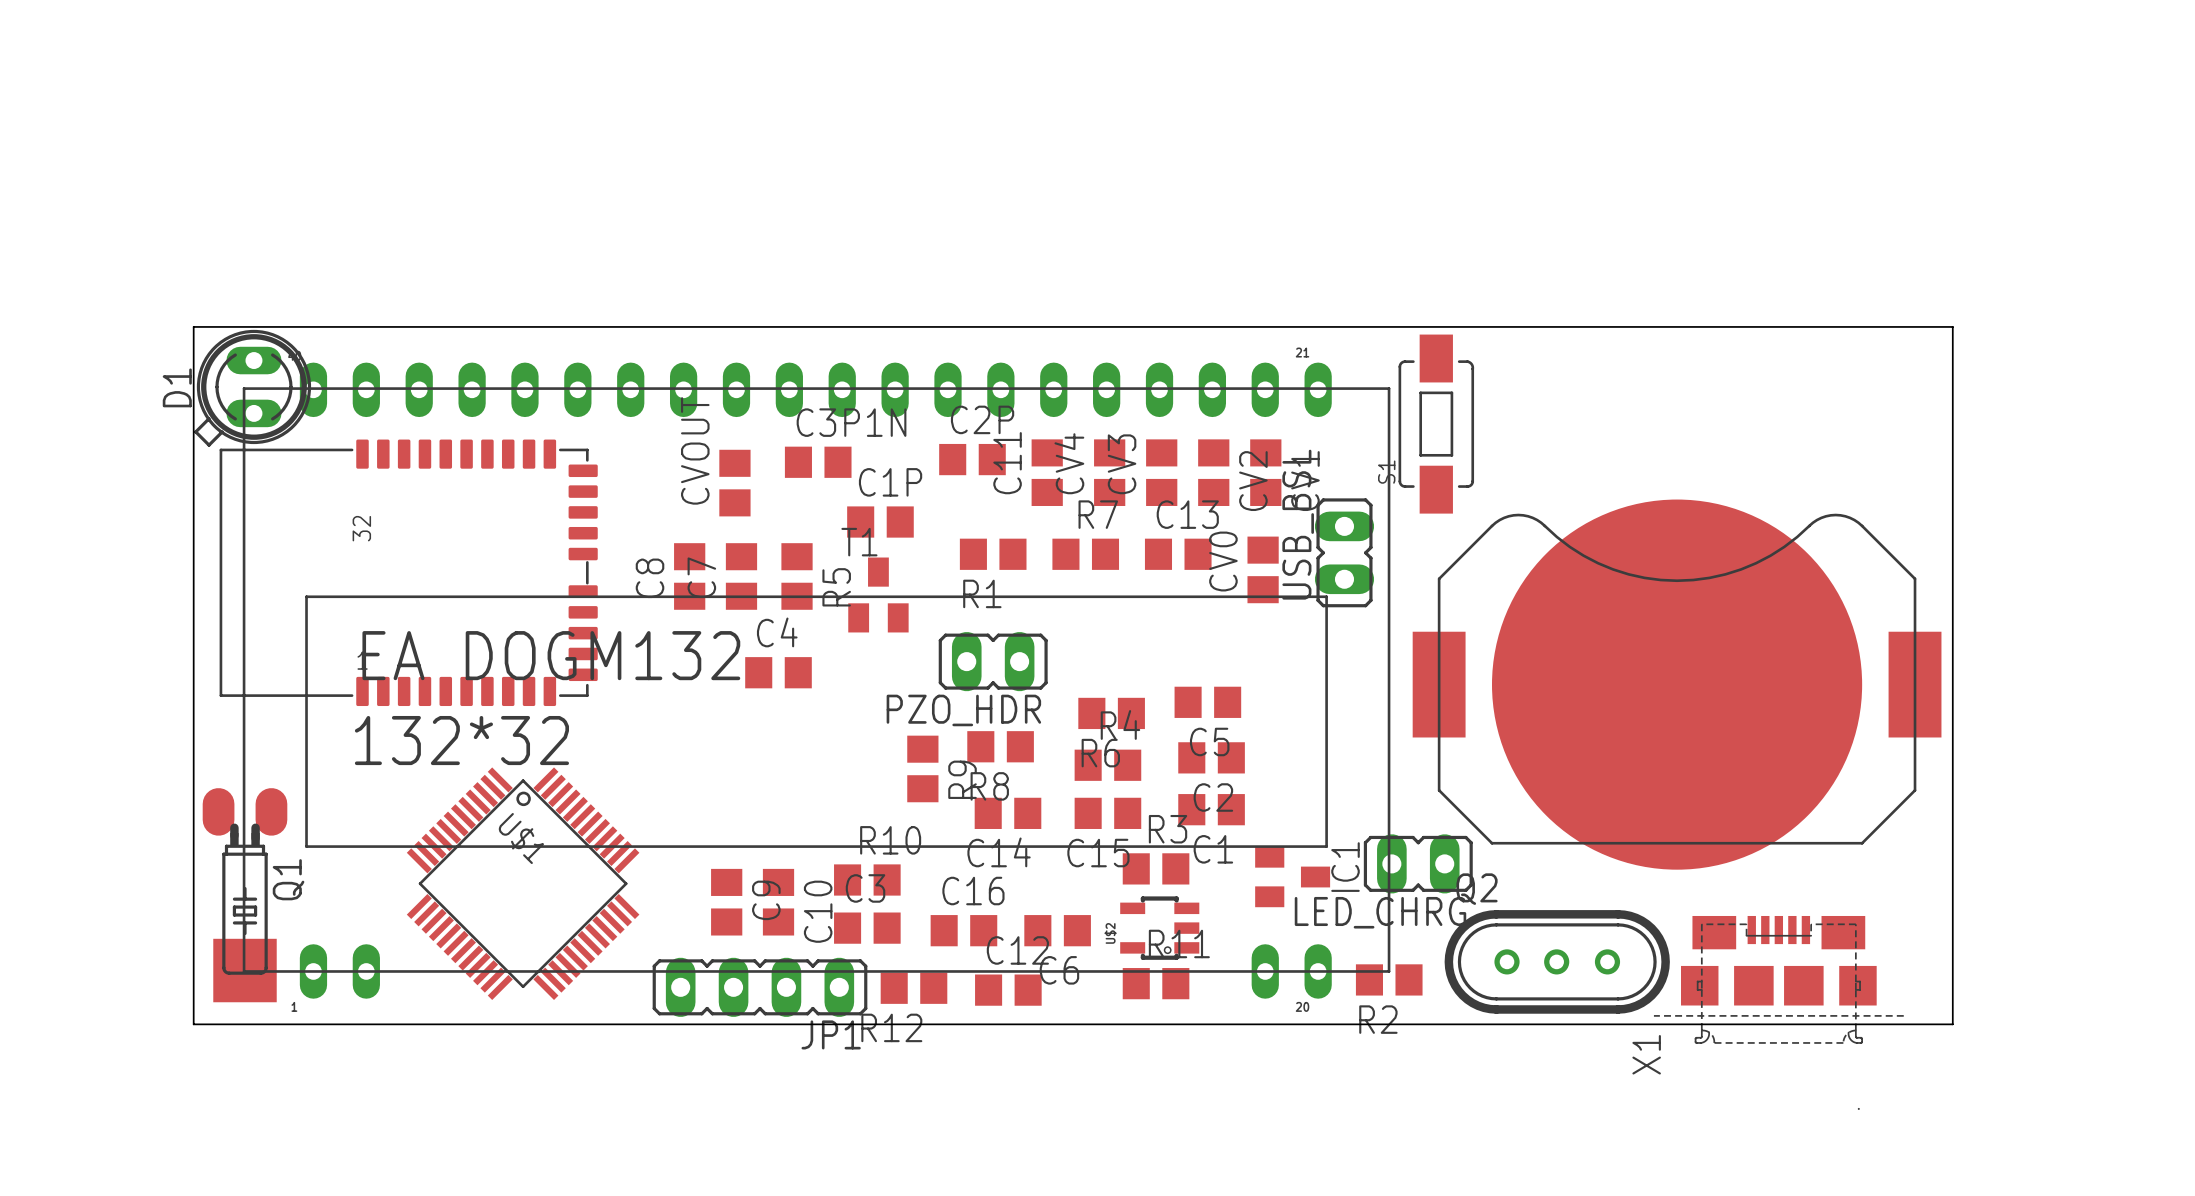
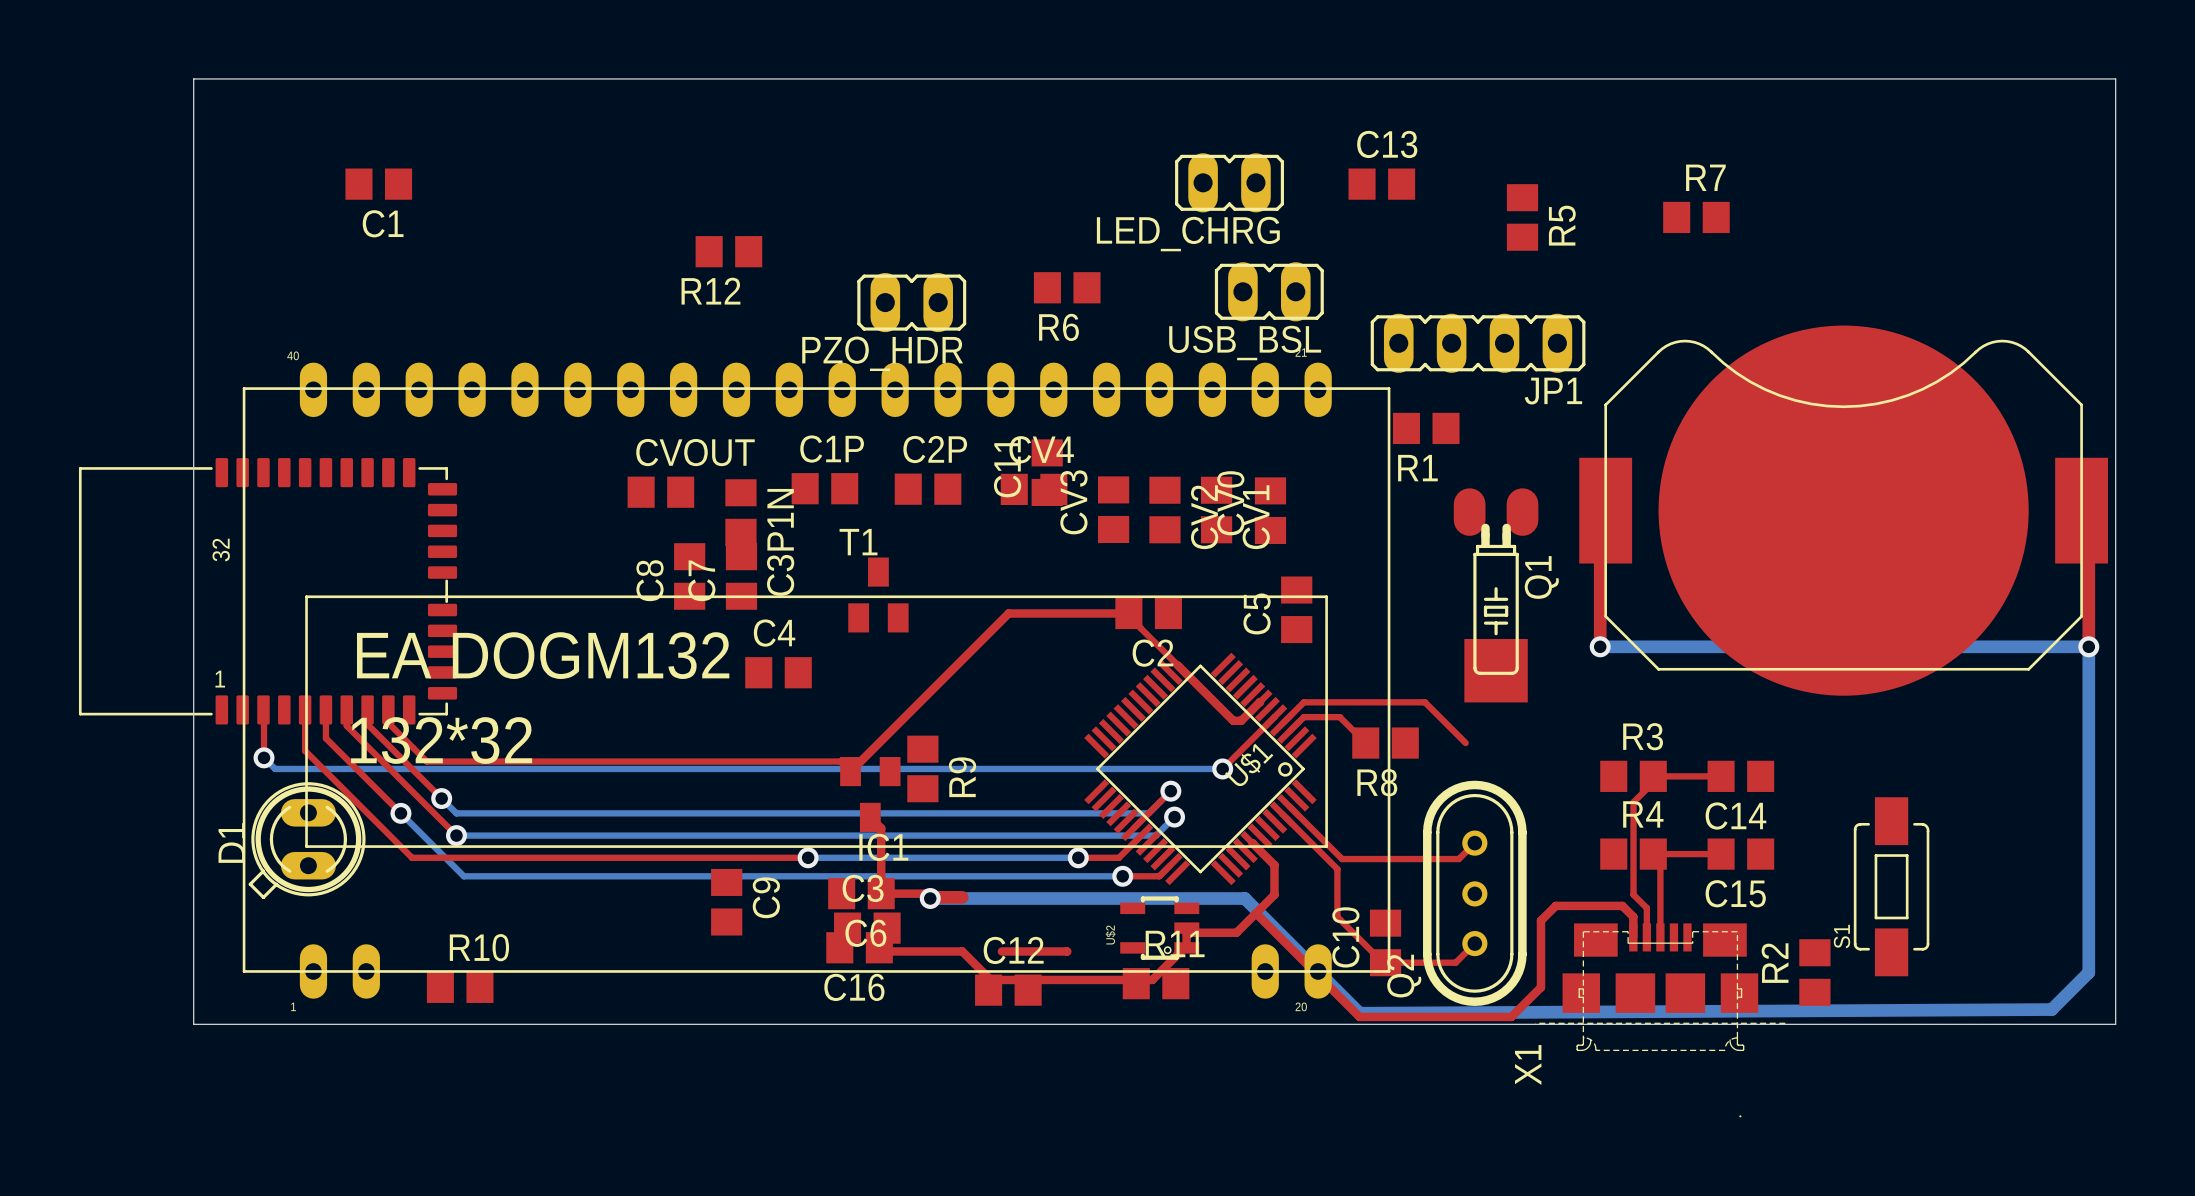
LED_CHRG: none -> (1229, 182)
board edge: (193, 326) (1952, 326) (1952, 1024) -> (193, 326) (193, 78) (2115, 78) (2115, 1024) (1952, 1024)
D1 position: (252, 388) -> (307, 840)
S1 position: (1436, 424) -> (1891, 886)
C2P position: (972, 459) -> (928, 489)
C3P1N rotation: 0° (818, 462) -> 90° clockwise (740, 512)
C3P1N position: (818, 462) -> (740, 512)
CV4 rotation: 0° (1109, 472) -> 90° clockwise (1034, 489)
CV4 position: (1109, 472) -> (1034, 489)
CV3 position: (1161, 472) -> (1113, 509)
CV2 position: (1213, 472) -> (1164, 510)
CV1 position: (1265, 472) -> (1216, 510)
CVOUT rotation: 0° (734, 483) -> 90° clockwise (660, 492)
CVOUT position: (734, 483) -> (660, 492)
top track: none -> (1605, 510) (1600, 516) (1600, 646)
top track: none -> (2081, 510) (2081, 513) (2088, 520) (2088, 646)
C1P position: (880, 522) -> (824, 488)
USB_BSL name position: USB_BSL (1298, 524) -> USB_BSL (1245, 343)
USB_BSL rotation: 0° (1344, 552) -> 90° clockwise (1269, 291)
USB_BSL position: (1344, 552) -> (1269, 291)
R1 position: (993, 554) -> (1426, 428)
R7 position: (1085, 554) -> (1696, 217)
C13 position: (1178, 554) -> (1381, 184)
CV0 position: (1263, 569) -> (1270, 510)
part position: (408, 572) -> (268, 591)
R5 position: (797, 576) -> (1522, 217)
bottom track: none -> (1600, 646) (2088, 646) (2088, 972) (2051, 1009) (1359, 1013) (1244, 898) (930, 898)
via: none -> (1600, 646)
via: none -> (2088, 646)
PZO_HDR position: (993, 661) -> (911, 302)
part position: (1677, 684) -> (1843, 510)
top track: none -> (1260, 701) (1241, 720) (1233, 720) (1140, 628) (1128, 613) (1008, 613) (850, 771) (840, 761) (426, 761) (388, 723) (388, 709)
C5 rotation: 0° (1207, 702) -> 90° clockwise (1296, 609)
C5 position: (1207, 702) -> (1296, 609)
top track: none -> (263, 709) (264, 757)
top track: none -> (305, 709) (305, 750) (412, 857) (808, 857)
top track: none -> (325, 709) (325, 738) (400, 813)
top track: none -> (346, 709) (346, 725) (456, 835)
top track: none -> (367, 709) (367, 724) (441, 798)
R6 position: (1111, 713) -> (1067, 287)
top track: none -> (1274, 716) (1222, 768)
top track: none -> (1282, 724) (1303, 702) (1424, 702) (1465, 743)
top track: none -> (1289, 731) (1303, 717) (1339, 717) (1365, 743)
R8 position: (1000, 746) -> (1385, 743)
bottom track: none -> (264, 757) (275, 768) (1222, 768)
via: none -> (264, 757)
C2 position: (1211, 757) -> (1148, 613)
R4 position: (1107, 765) -> (1633, 854)
via: none -> (1222, 768)
top track: none -> (1721, 776) (1653, 776) (1648, 781) (1648, 787) (1633, 802) (1633, 894) (1646, 908) (1646, 937)
top track: none -> (1170, 791) (1133, 828)
bottom track: none -> (1170, 791) (1148, 813) (456, 813) (441, 798)
via: none -> (1170, 791)
via: none -> (441, 798)
top track: none -> (1289, 806) (1342, 859) (1458, 859) (1474, 843)
C1 position: (1211, 809) -> (378, 184)
bottom track: none -> (400, 813) (463, 876) (1122, 876)
via: none -> (400, 813)
C14 position: (1007, 813) -> (1740, 776)
C15 position: (1107, 813) -> (1740, 854)
top track: none -> (1282, 813) (1337, 869) (1337, 917) (1383, 962) (1455, 962) (1474, 943)
top track: none -> (870, 817) (881, 828) (881, 893) (925, 893) (930, 898) (929, 897) (962, 897)
bottom track: none -> (1174, 817) (1156, 835) (456, 835)
via: none -> (1174, 817)
via: none -> (456, 835)
top track: none -> (1140, 835) (1118, 857) (1078, 857)
top track: none -> (1252, 843) (1274, 865) (1274, 894) (1236, 932) (1186, 932) (1186, 945) (1152, 979) (990, 979) (962, 951) (883, 951) (879, 947)
top track: none -> (1721, 854) (1653, 854) (1660, 861) (1660, 937)
bottom track: none -> (808, 857) (1078, 857)
via: none -> (808, 857)
via: none -> (1078, 857)
LED_CHRG: (1418, 863) -> none
top track: none -> (1170, 865) (1159, 876) (1122, 876)
R3 position: (1156, 868) -> (1633, 776)
via: none -> (1122, 876)
IC1 rotation: 0° (1292, 877) -> 90° clockwise (870, 794)
IC1 position: (1292, 877) -> (870, 794)
R10 position: (867, 880) -> (460, 987)
U$1 rotation: 0° (523, 883) -> 90° clockwise (1200, 768)
U$1 position: (523, 883) -> (1200, 768)
C16 name position: C16 (973, 891) -> C16 (854, 987)
Q1 position: (245, 895) -> (1496, 595)
via: none -> (930, 898)
C10 position: (778, 902) -> (1385, 942)
C10 name position: C10 (818, 911) -> C10 (1345, 937)
top track: none -> (1255, 913) (1359, 1016) (1511, 1016) (1540, 987) (1540, 920) (1555, 905) (1622, 905) (1633, 916) (1633, 937)
C16 position: (963, 930) -> (859, 947)
C6 position: (1057, 930) -> (861, 893)
top track: none -> (1001, 951) (1067, 951)
Q2 rotation: 0° (1557, 961) -> 90° counterclockwise (1474, 893)
R2 rotation: 0° (1389, 979) -> 90° clockwise (1814, 972)
R2 position: (1389, 979) -> (1814, 972)
JP1 position: (760, 987) -> (1478, 343)
R12 position: (913, 988) -> (728, 251)
X1 position: (1778, 1012) -> (1660, 1020)

